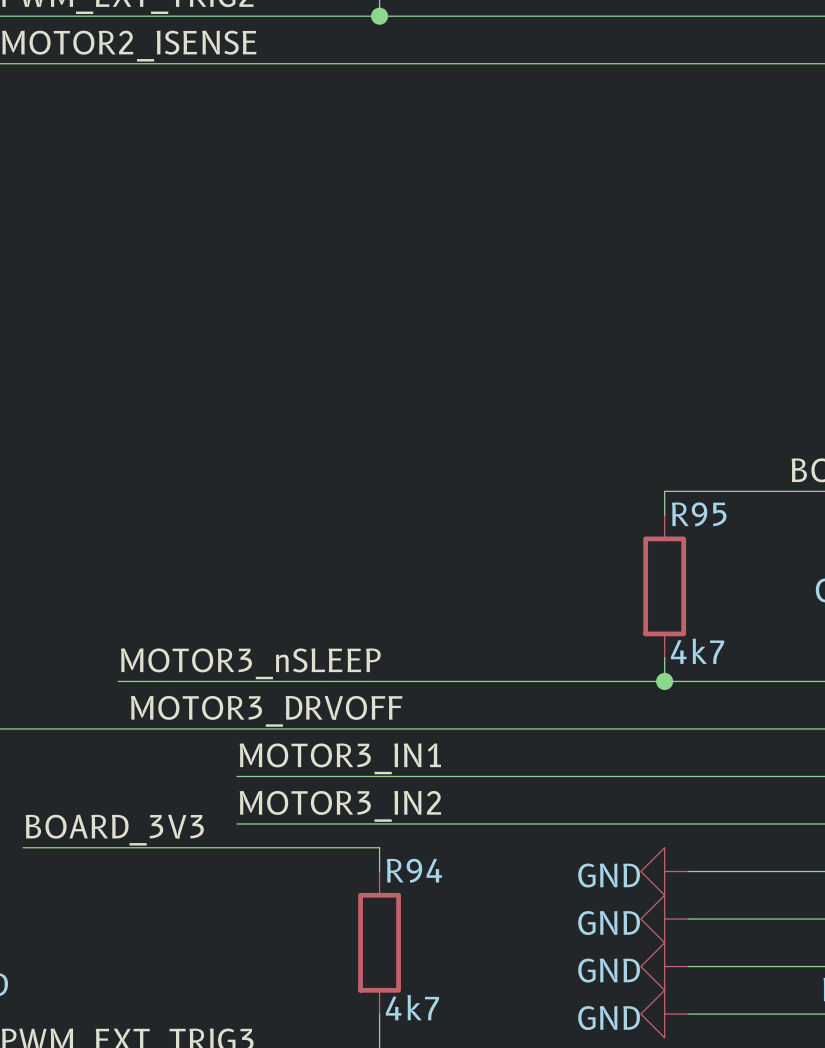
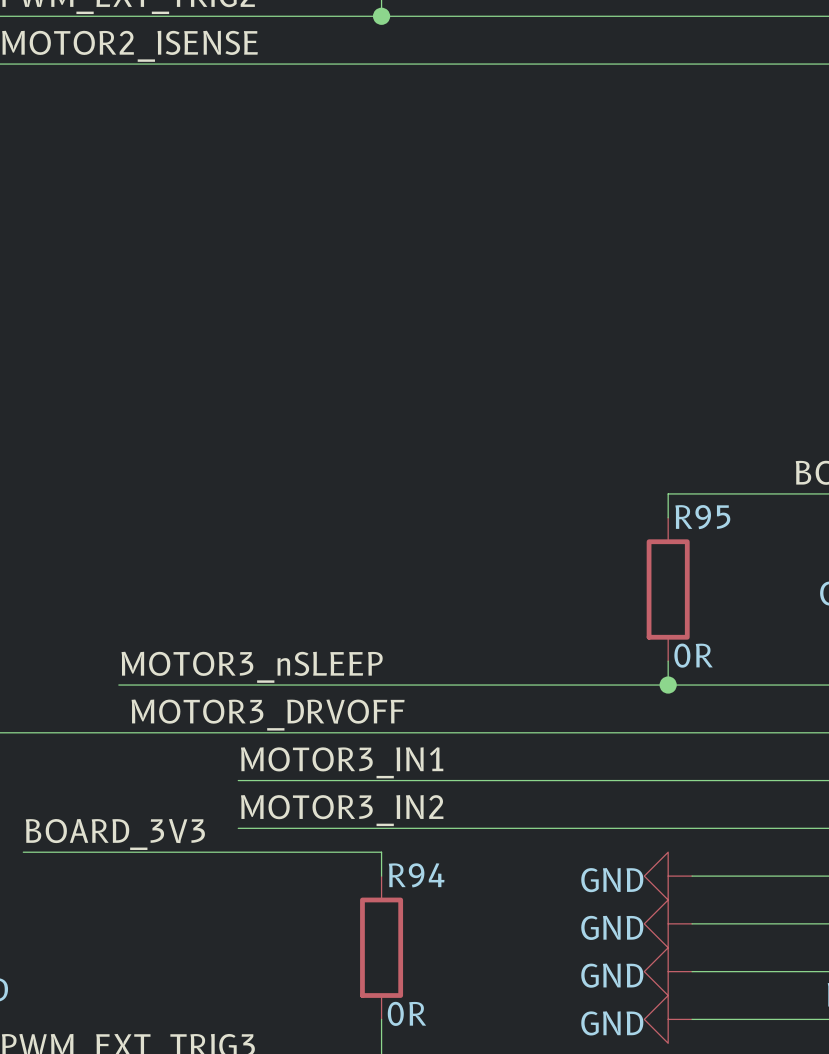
R95 value: 4k7 (697, 651) -> 0R (693, 655)
R94 value: 4k7 (412, 1007) -> 0R (406, 1013)

